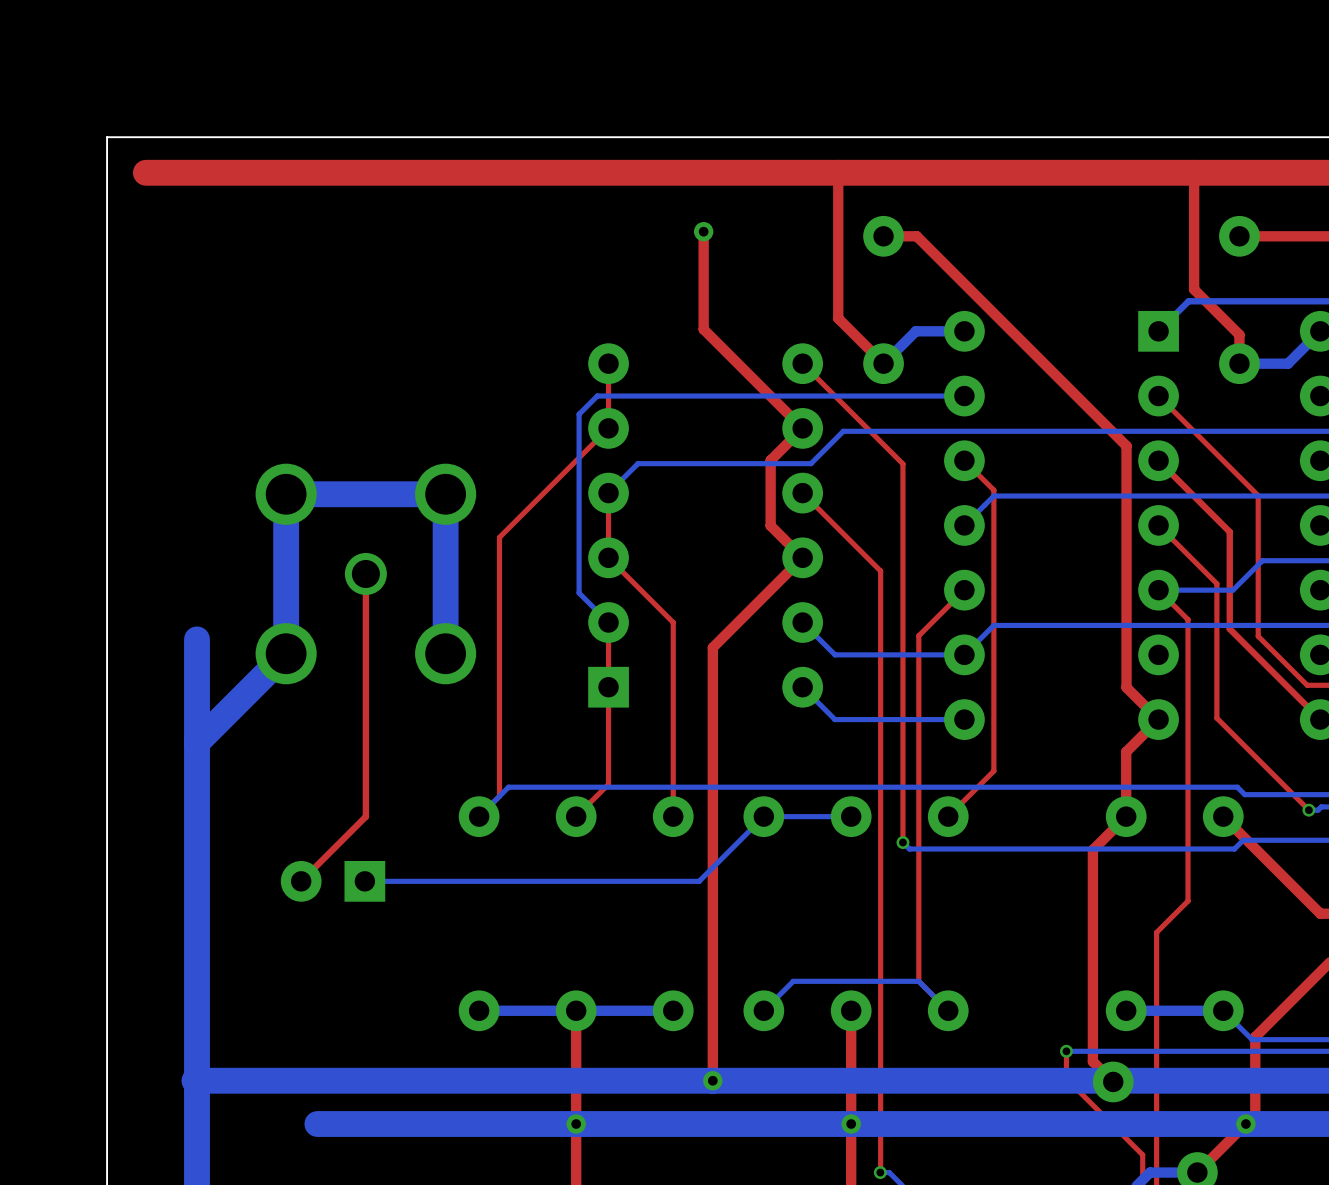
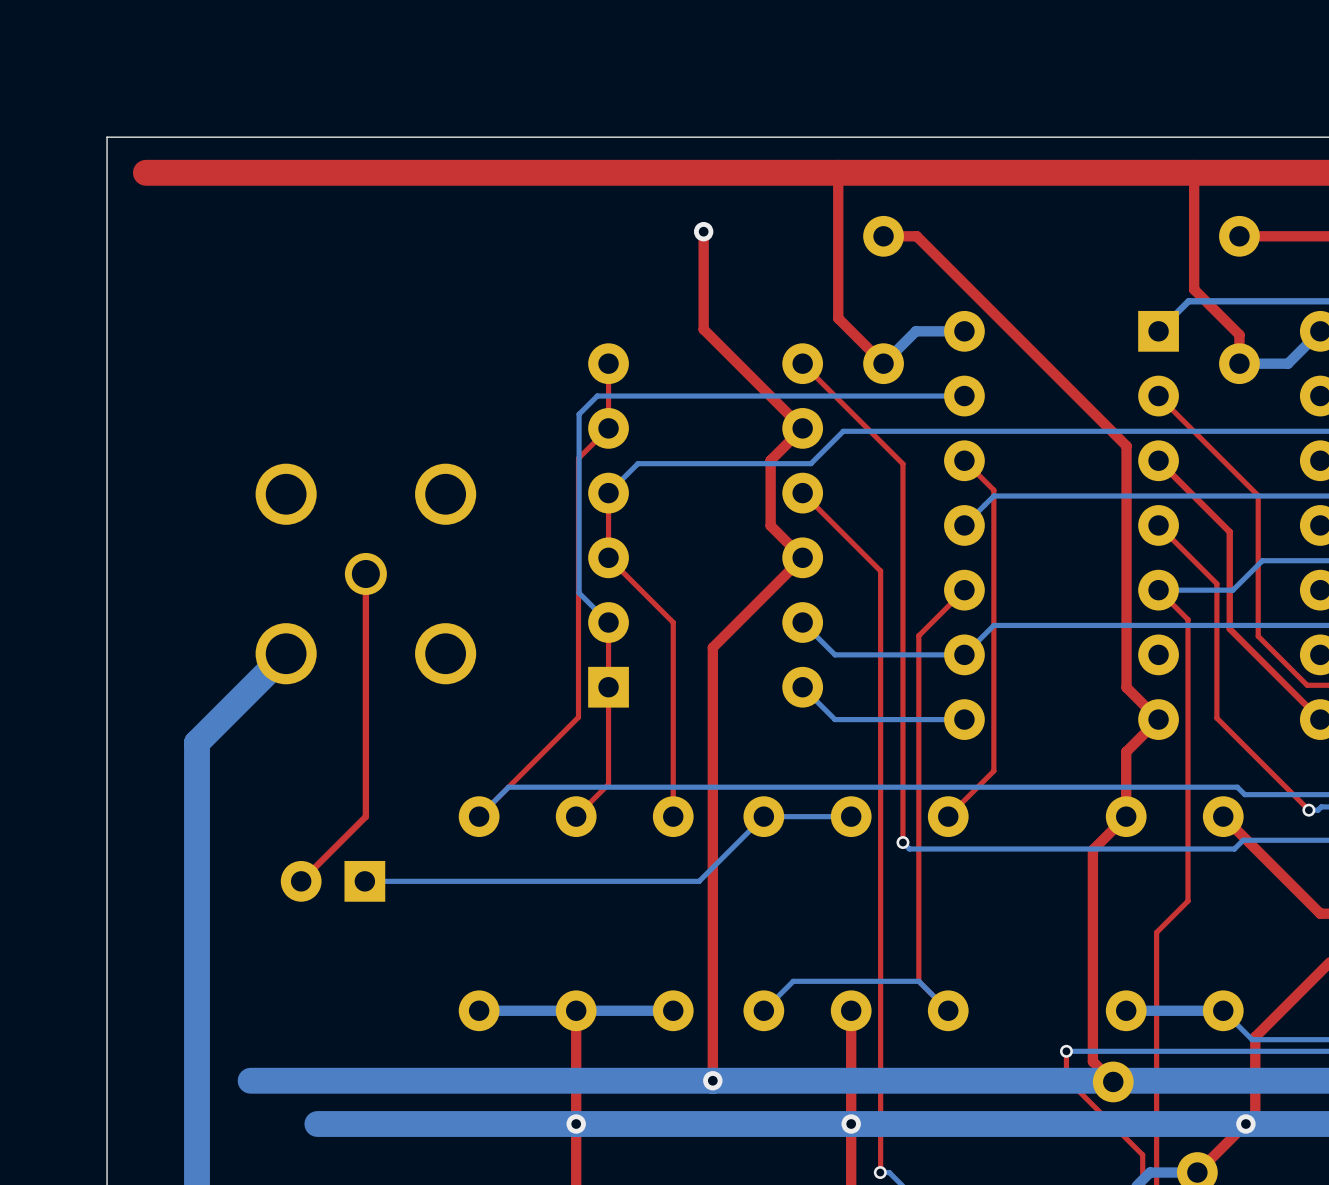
top track: (578, 458) (499, 537) (499, 796) -> (578, 458) (578, 717) (499, 796)
bottom track: (196, 639) (196, 742) -> none
bottom track: (445, 653) (445, 494) (286, 494) (286, 653) -> none
bottom track: (250, 1080) (194, 1080) -> none

